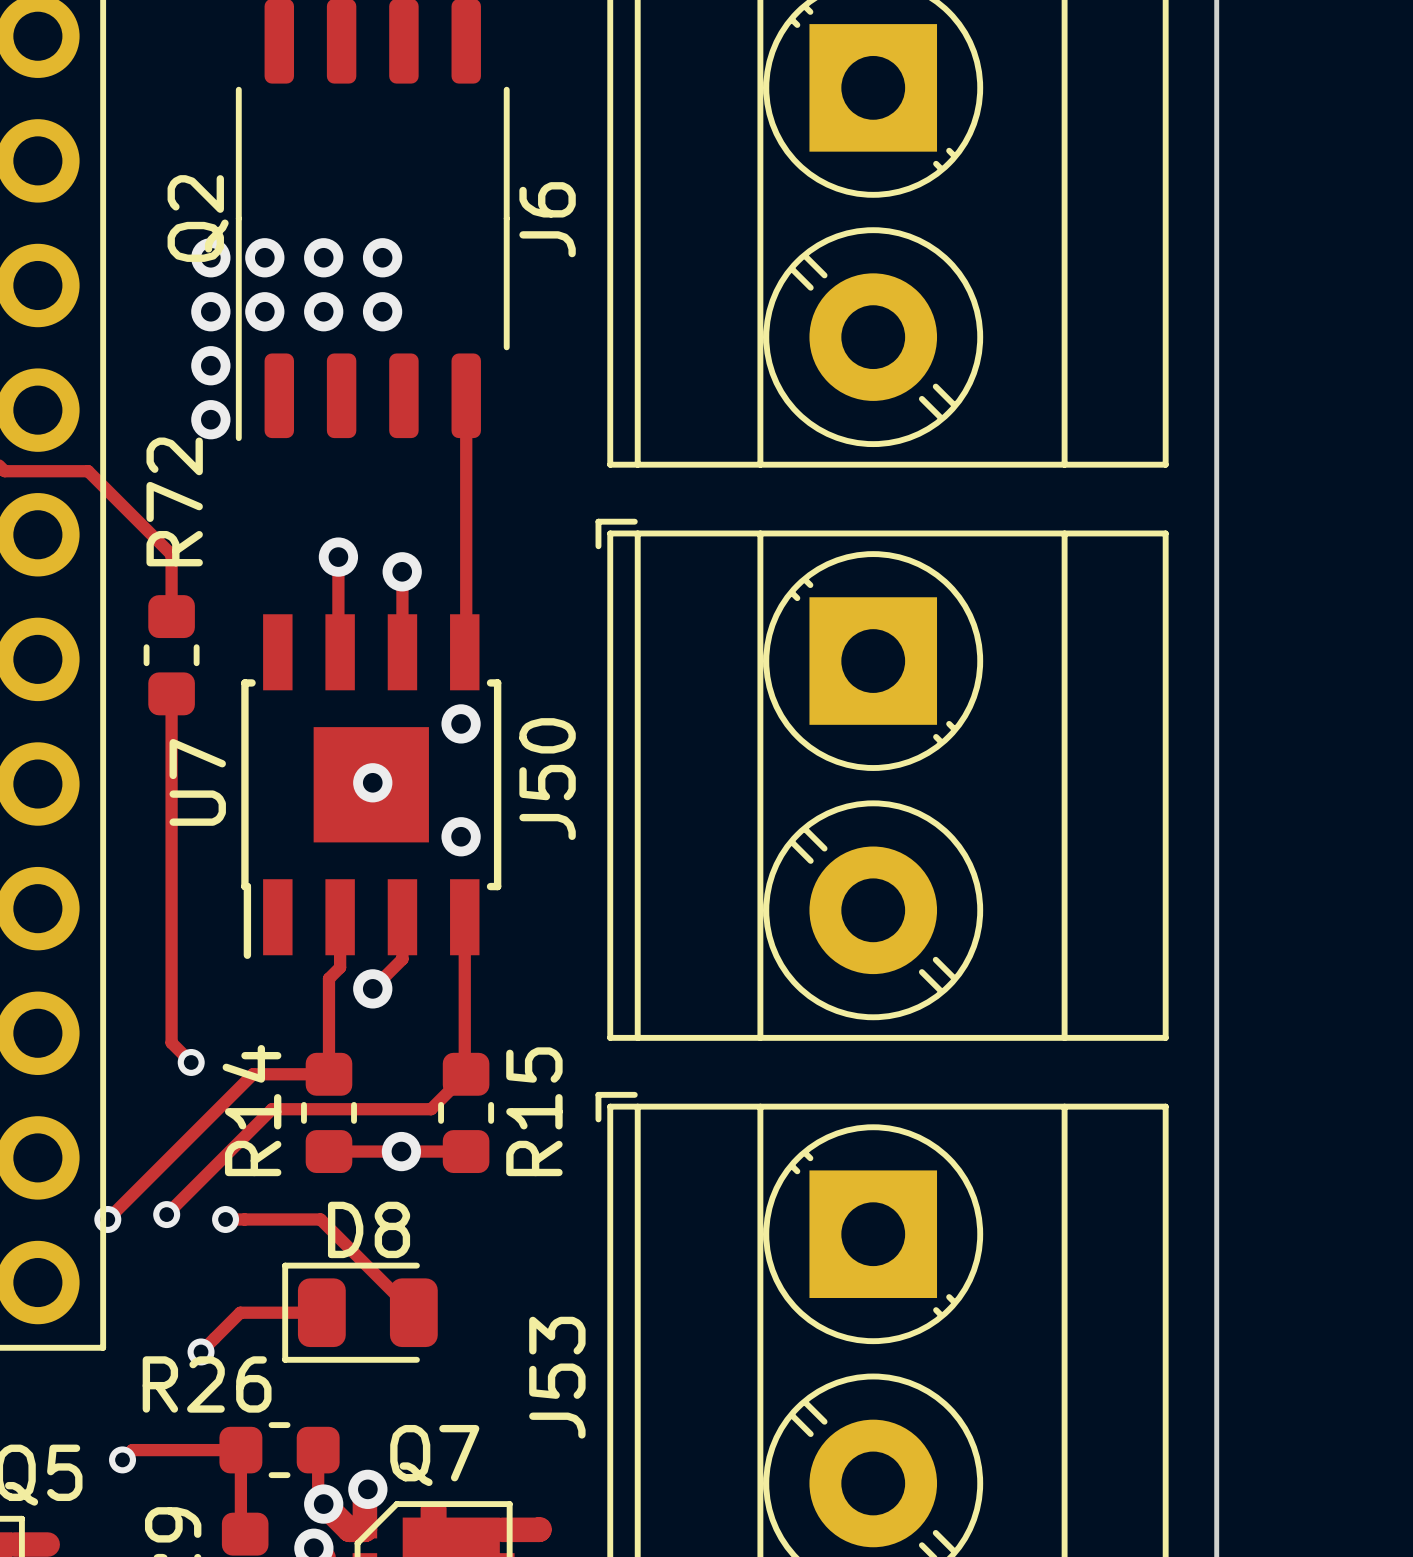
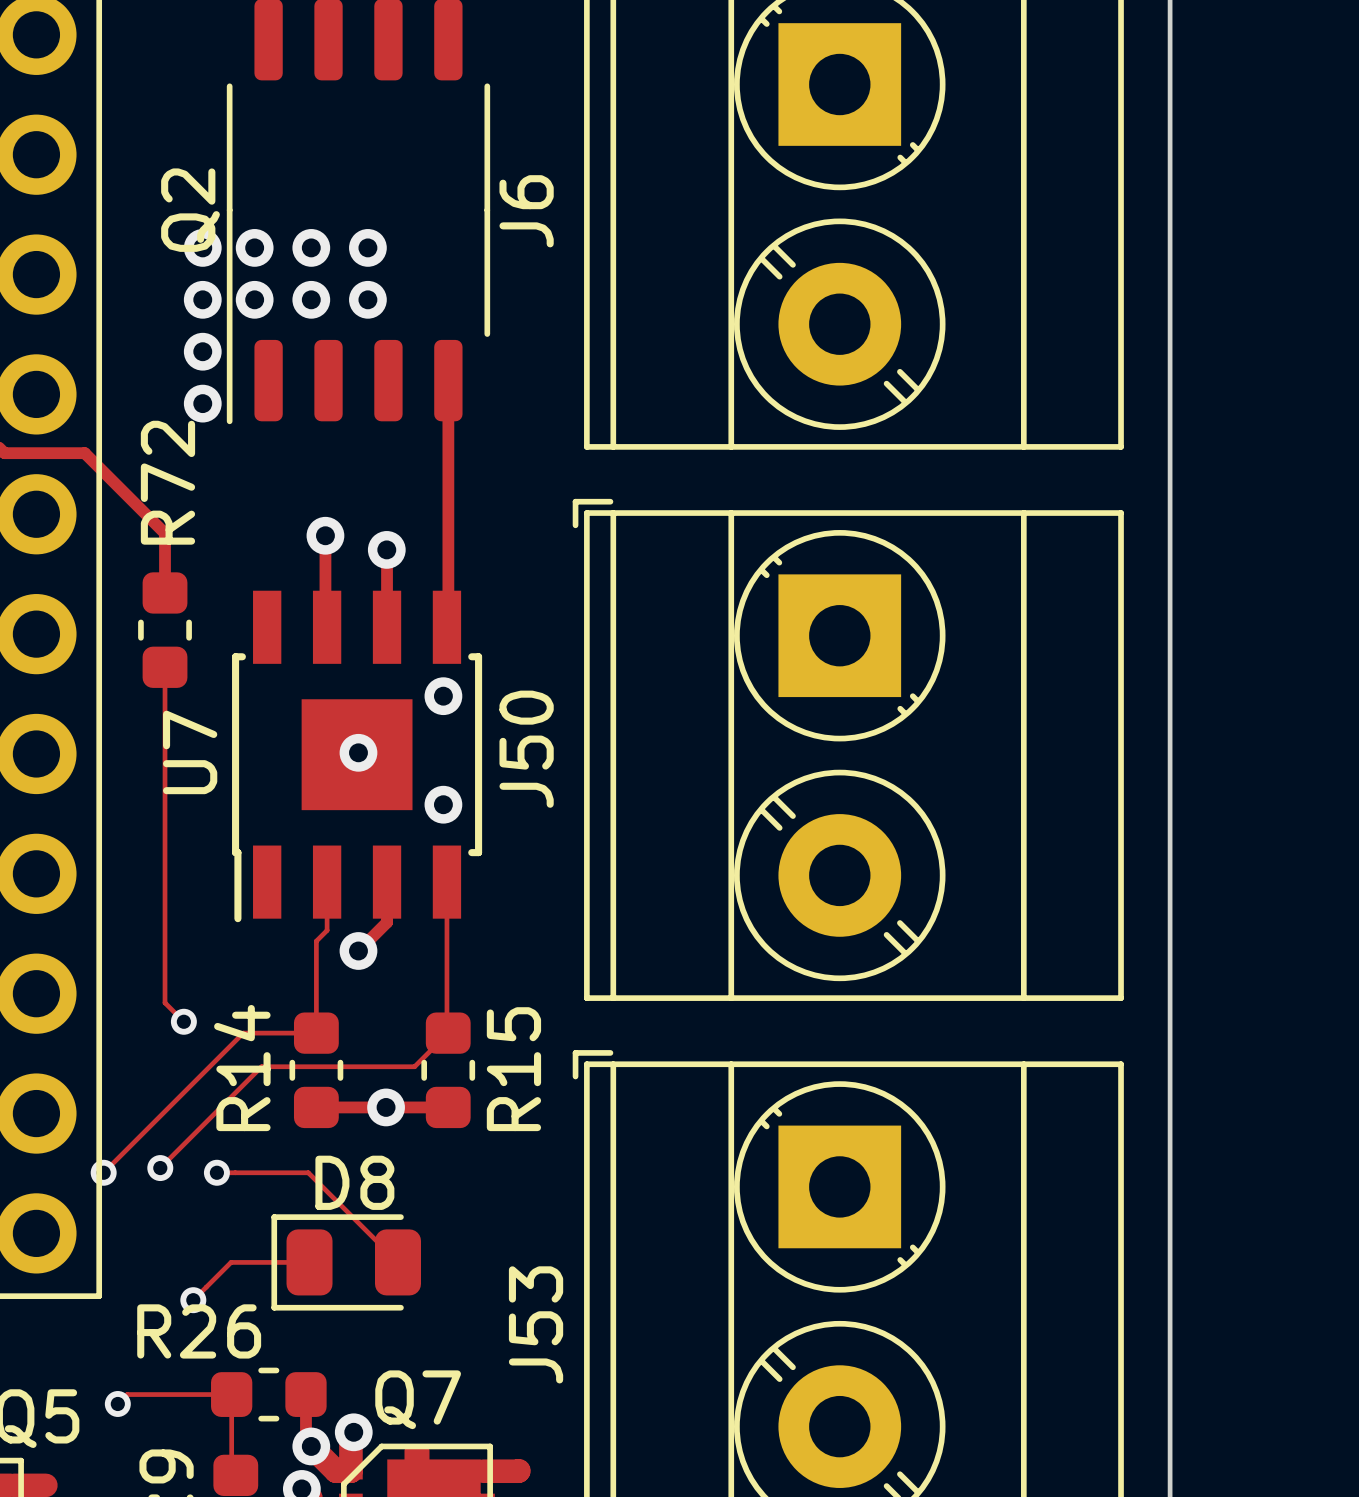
track width: thick (171, 693) (171, 1042) (191, 1062) -> thin (165, 667) (165, 1002) (183, 1021)
track width: thick (340, 917) (340, 967) (328, 978) (328, 1074) (253, 1074) (107, 1219) -> thin (327, 882) (327, 930) (316, 941) (316, 1033) (243, 1033) (103, 1172)
track width: thick (464, 917) (466, 1074) (431, 1109) (272, 1109) (166, 1214) -> thin (446, 882) (448, 1033) (414, 1066) (261, 1066) (160, 1168)
track width: thick (225, 1219) (320, 1219) (413, 1312) -> thin (216, 1172) (308, 1172) (398, 1262)
track width: thick (321, 1312) (240, 1312) (201, 1351) -> thin (309, 1262) (231, 1262) (193, 1300)
track width: thick (122, 1459) (132, 1450) (240, 1450) (240, 1529) (245, 1534) -> thin (117, 1403) (127, 1394) (231, 1394) (231, 1471) (235, 1475)

